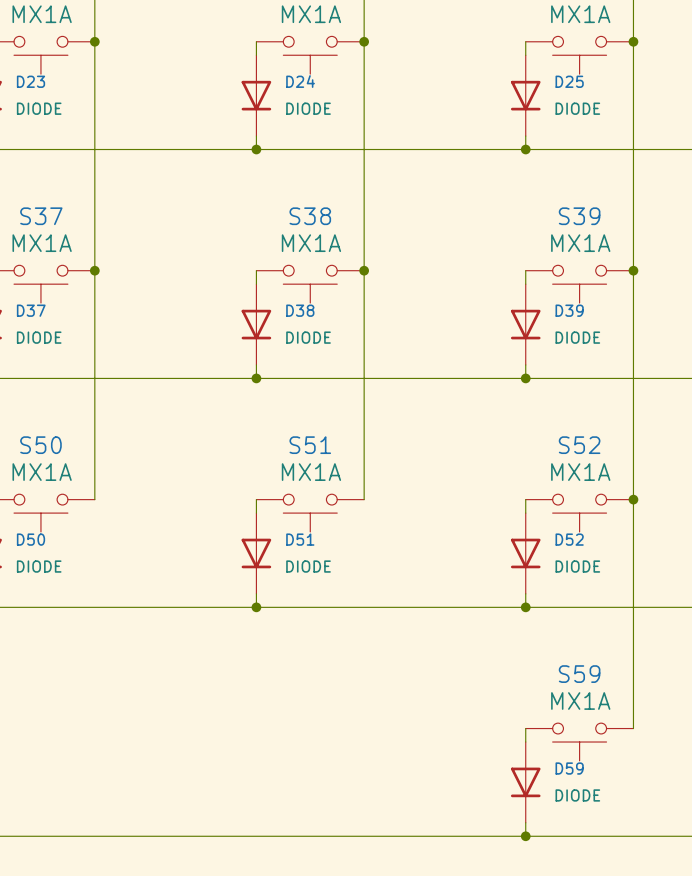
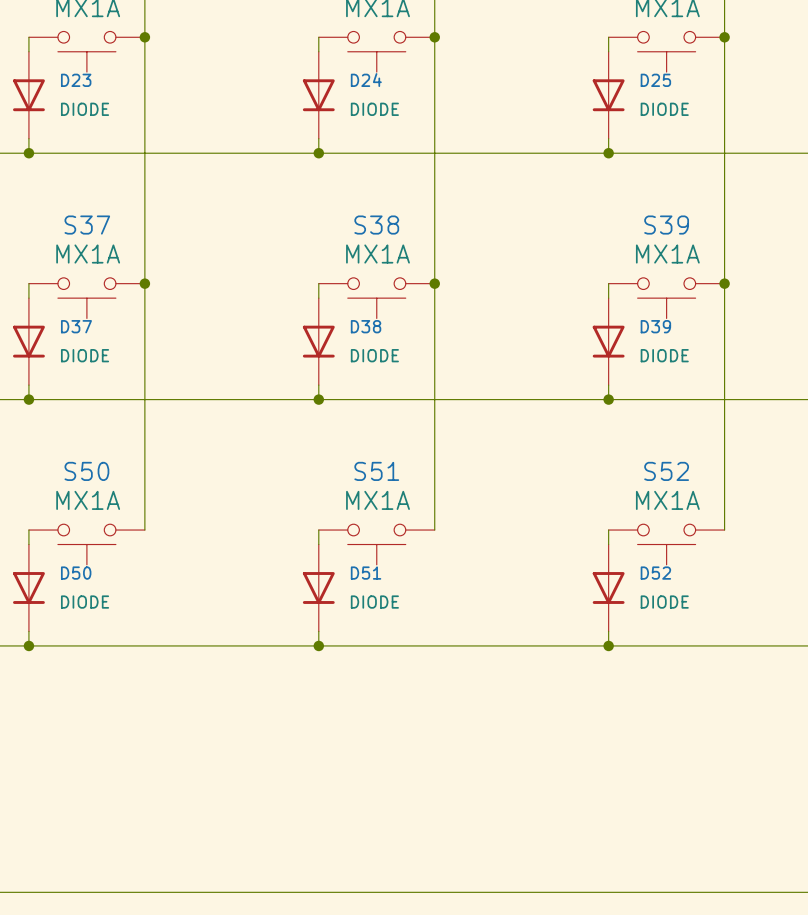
wire: (633, 499) (633, 728) -> none
junction: (633, 499) -> none
wire: (525, 728) (525, 742) -> none
S59: MX1A (579, 742) -> none
D59: DIODE (525, 782) -> none
wire: (525, 822) (525, 836) -> none
junction: (525, 836) -> none

